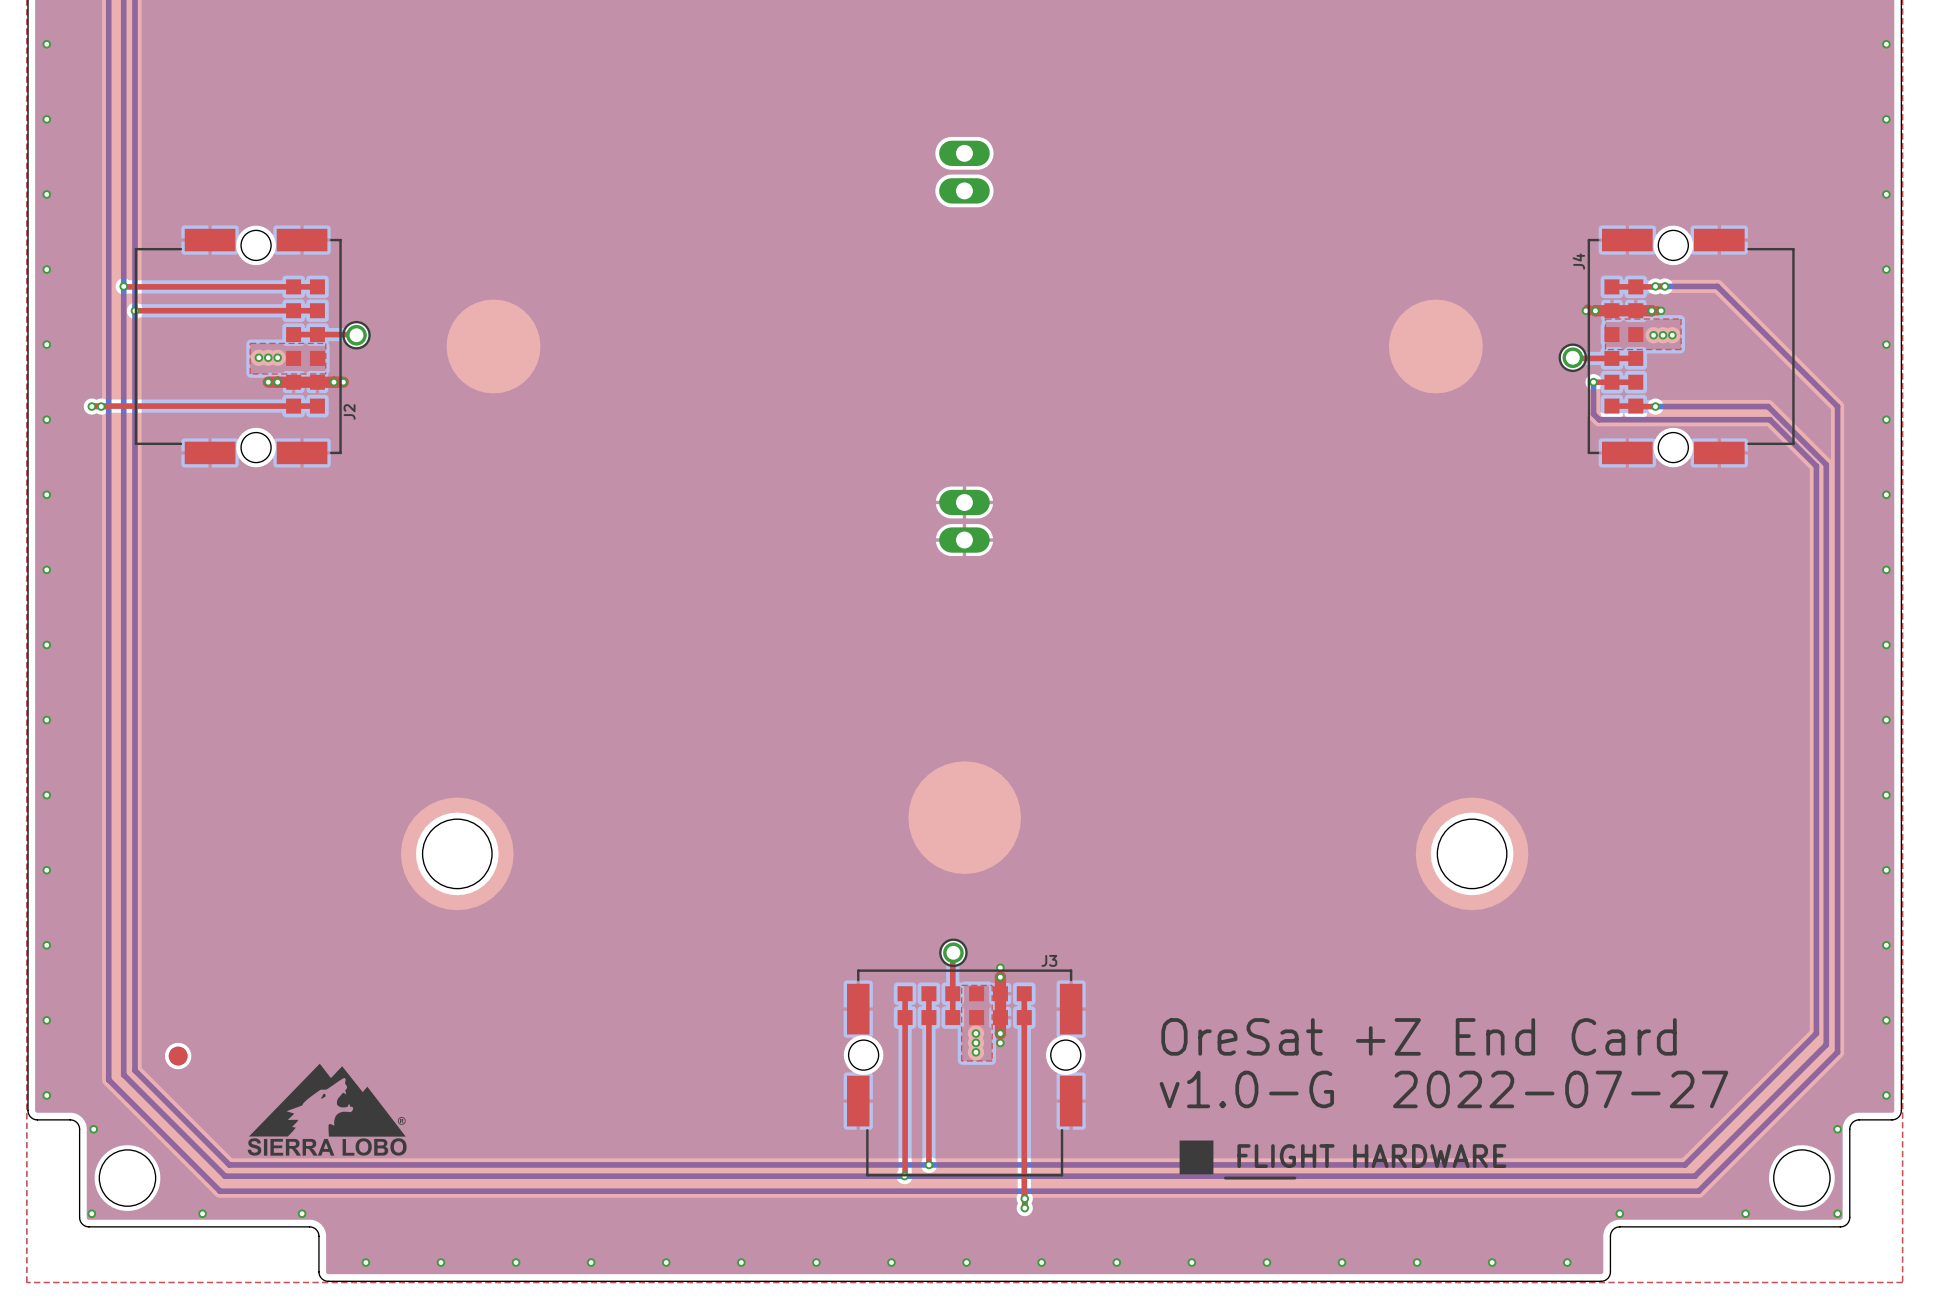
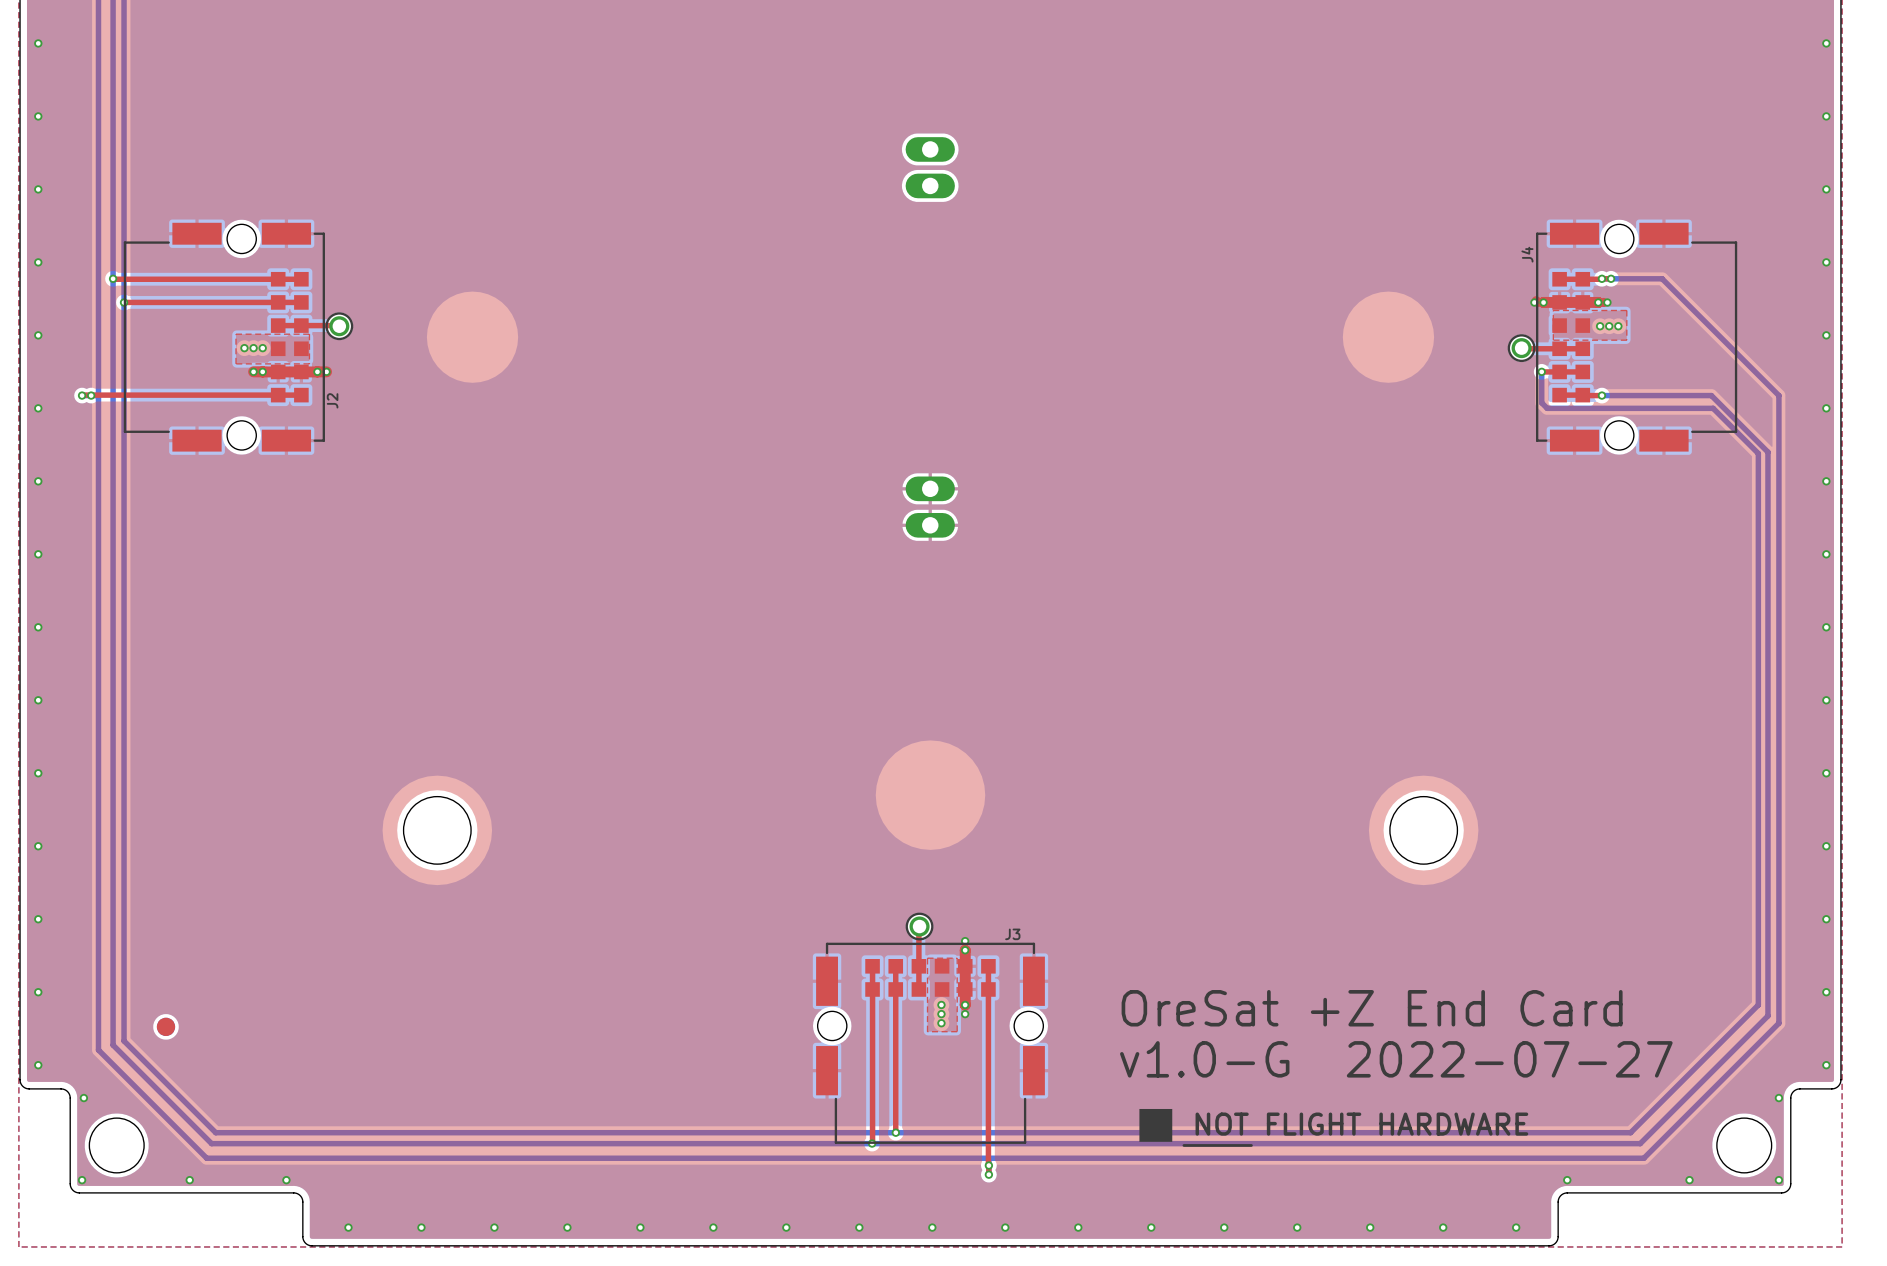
drawing: [247, 1063, 407, 1156] -> none
drawing shape: [1179, 1140, 1507, 1180] -> [1139, 1108, 1529, 1147]

